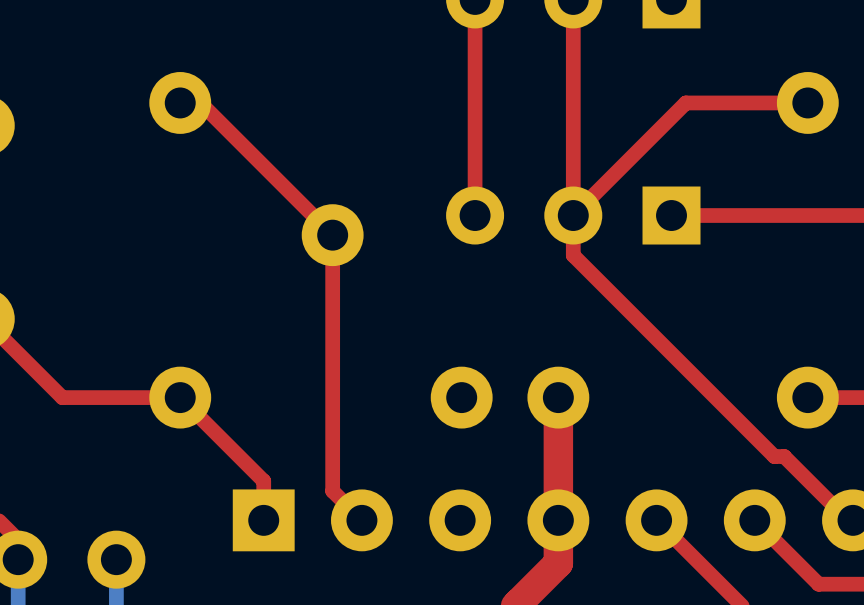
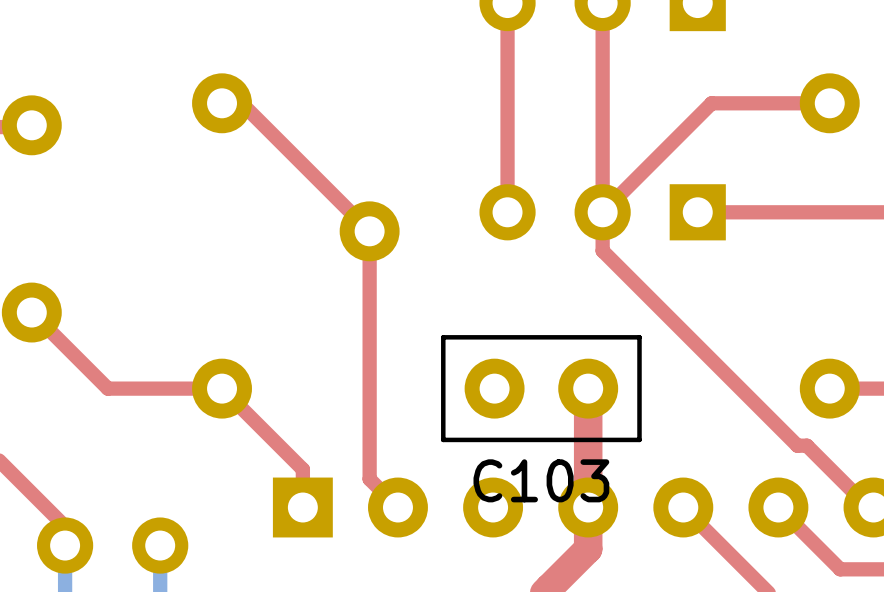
C103 side: top (510, 397) -> bottom (541, 388)

